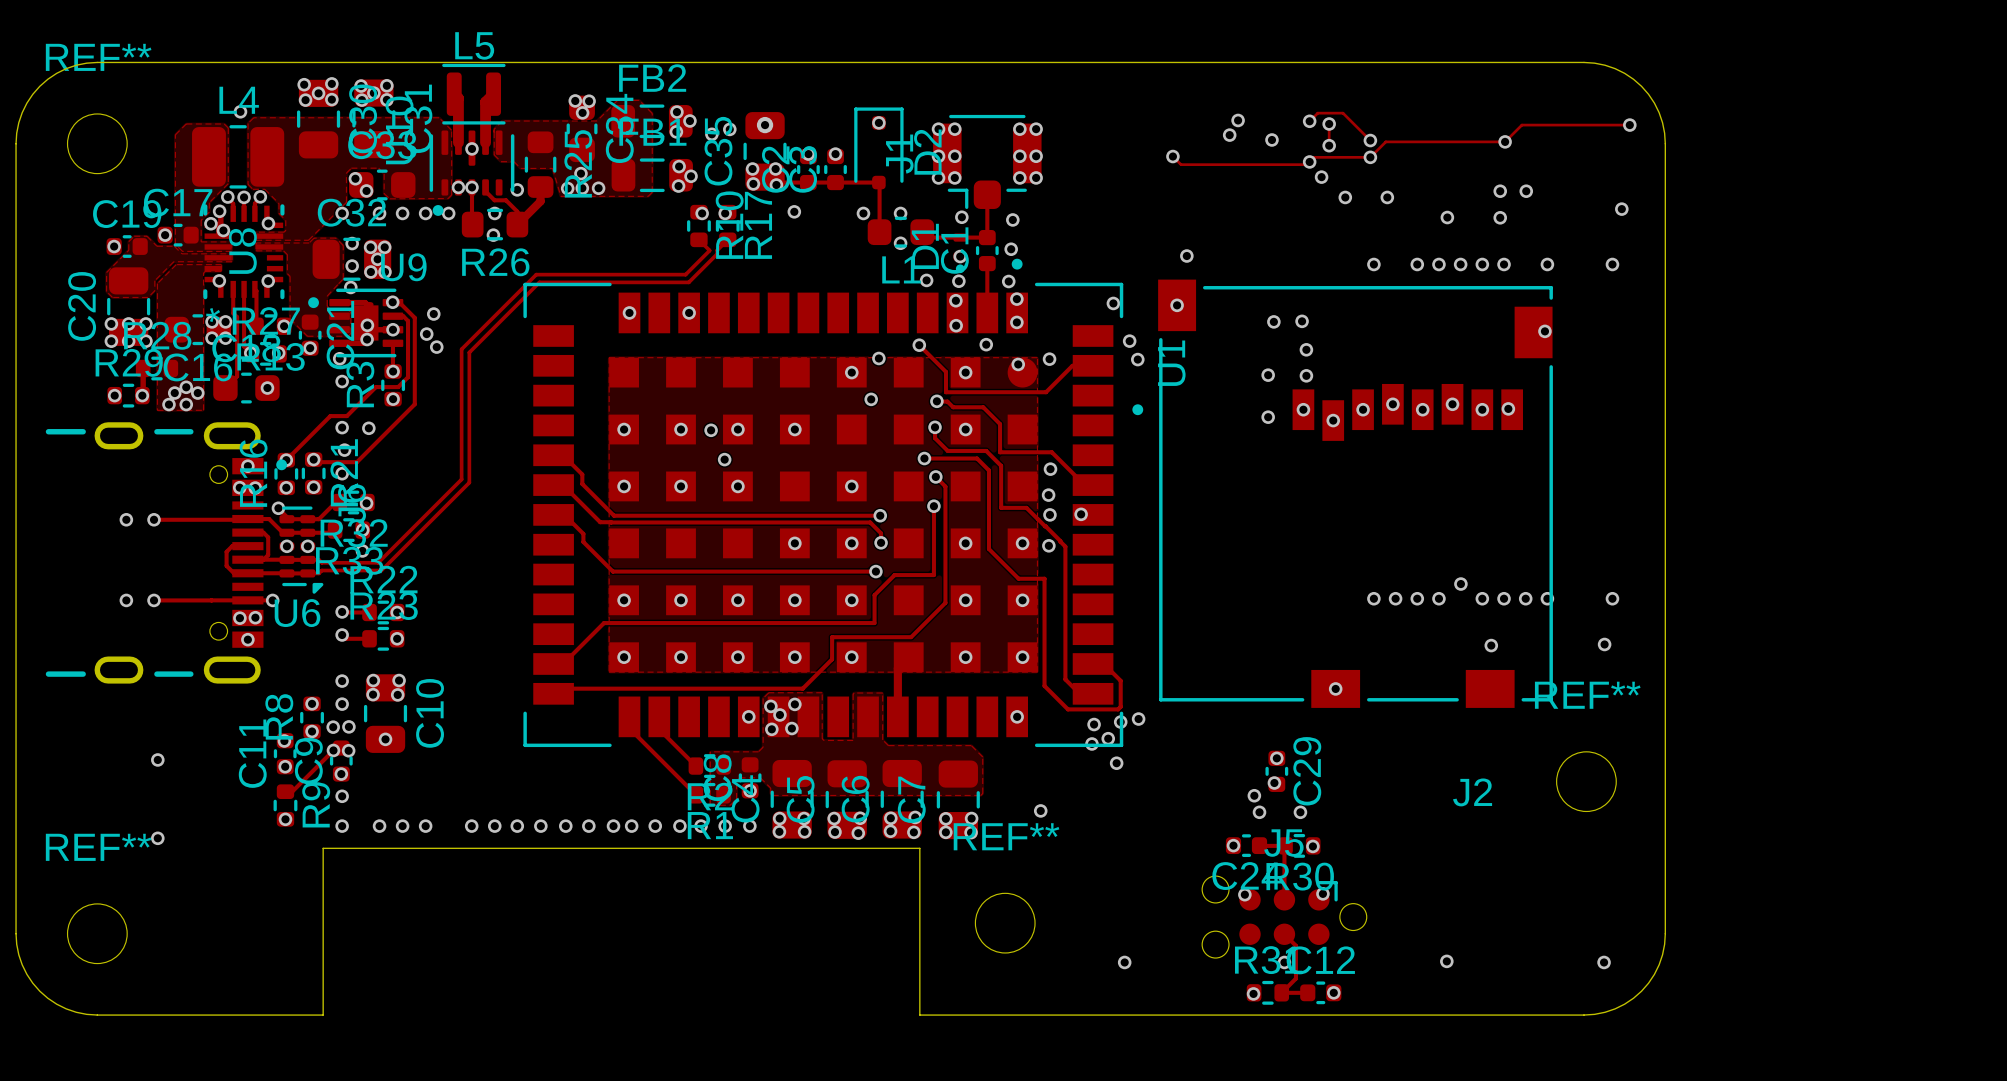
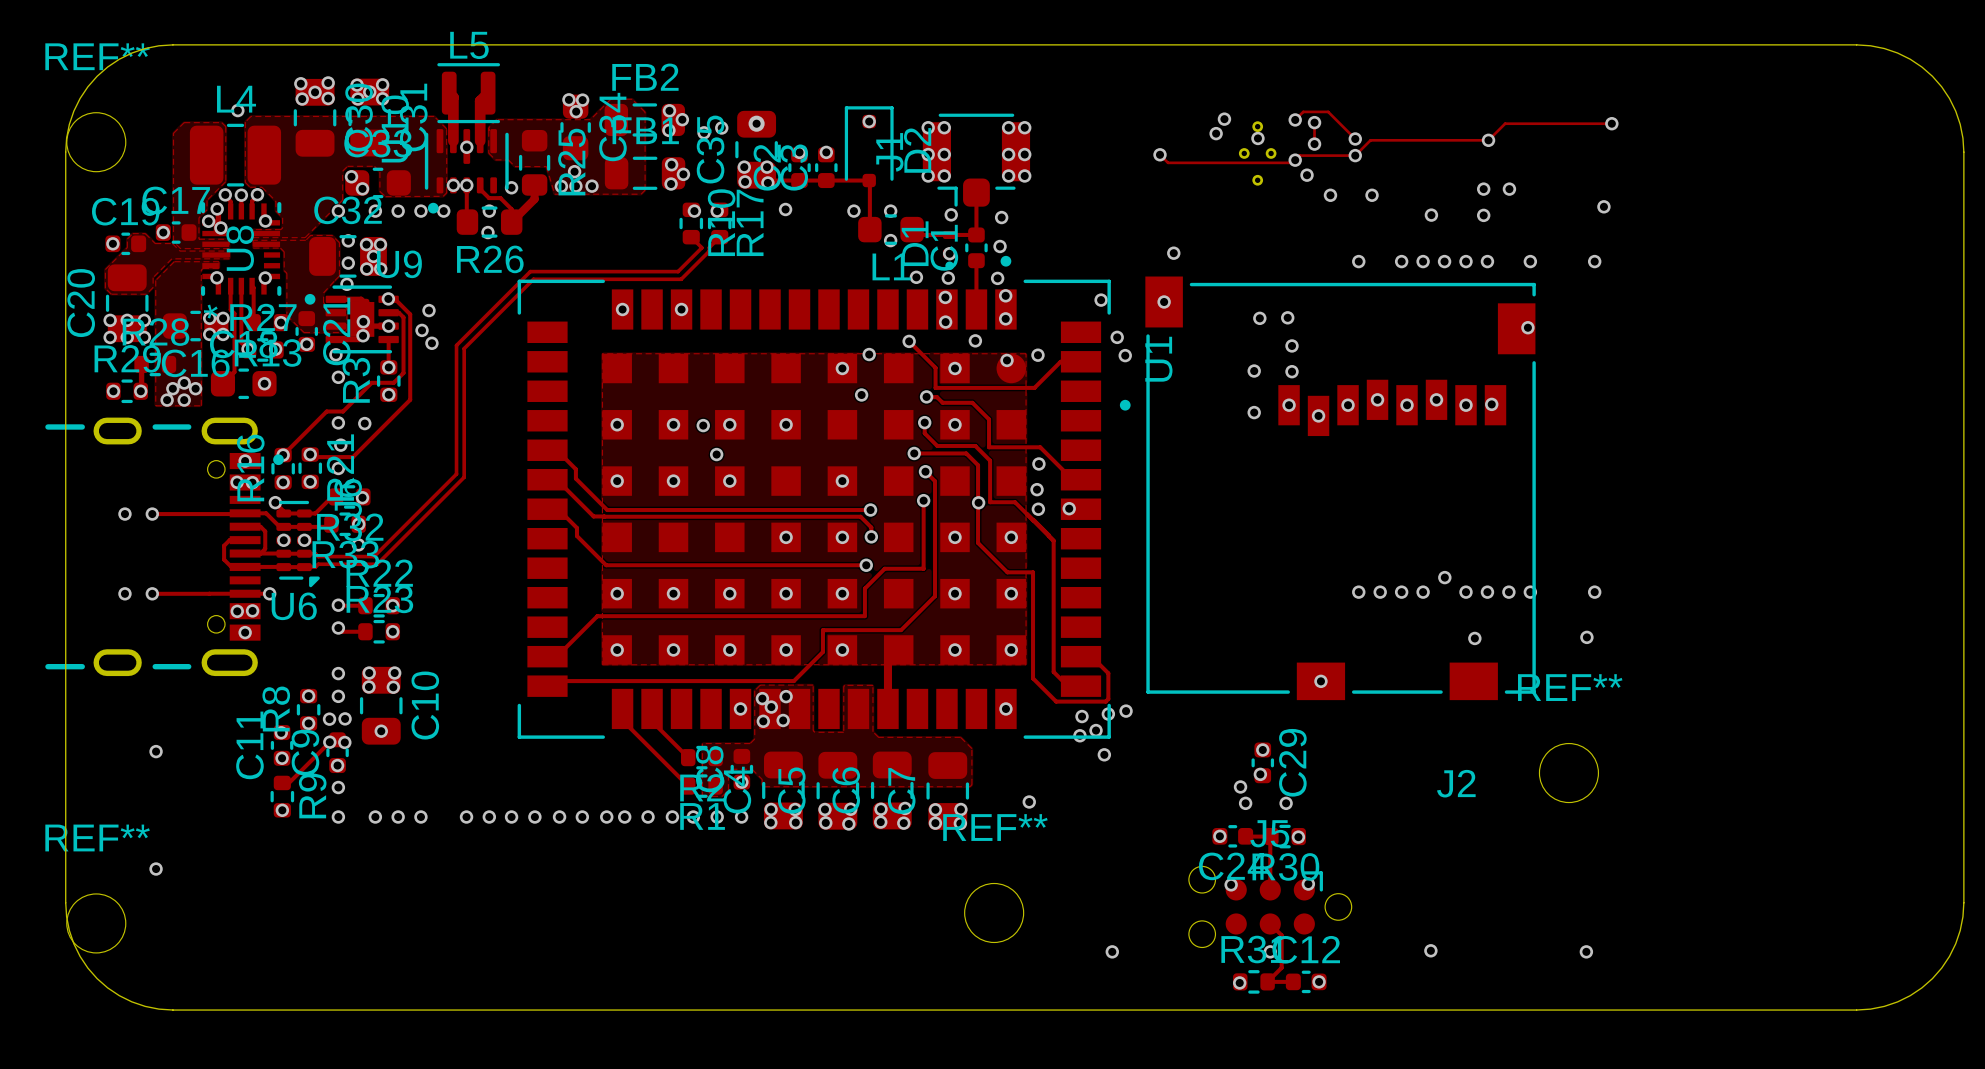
board edge: (97, 62) (1583, 62) (1605, 65) (1624, 73) (1641, 86) (1654, 103) (1662, 122) (1665, 143) (1665, 933) (1662, 954) (1654, 974) (1641, 991) (1624, 1004) (1605, 1012) (1583, 1015) (919, 1015) (919, 848) (323, 848) (323, 1015) (97, 1015) (76, 1012) (56, 1004) (39, 991) (26, 974) (18, 954) (16, 933) (16, 143) (22, 112) (39, 86) (66, 68) (97, 62) -> (172, 44) (145, 48) (131, 53) (119, 59) (97, 76) (87, 86) (73, 111) (66, 138) (65, 152) (65, 902) (69, 930) (80, 956) (97, 978) (119, 995) (145, 1006) (172, 1010) (1856, 1010) (1884, 1006) (1910, 995) (1932, 978) (1949, 956) (1960, 930) (1963, 902) (1963, 152) (1960, 124) (1949, 98) (1932, 76) (1910, 59) (1884, 48) (1856, 44) (172, 44)
part: none -> (1257, 153)
via position: (1048, 545) -> (978, 502)
via position: (157, 838) -> (156, 869)

